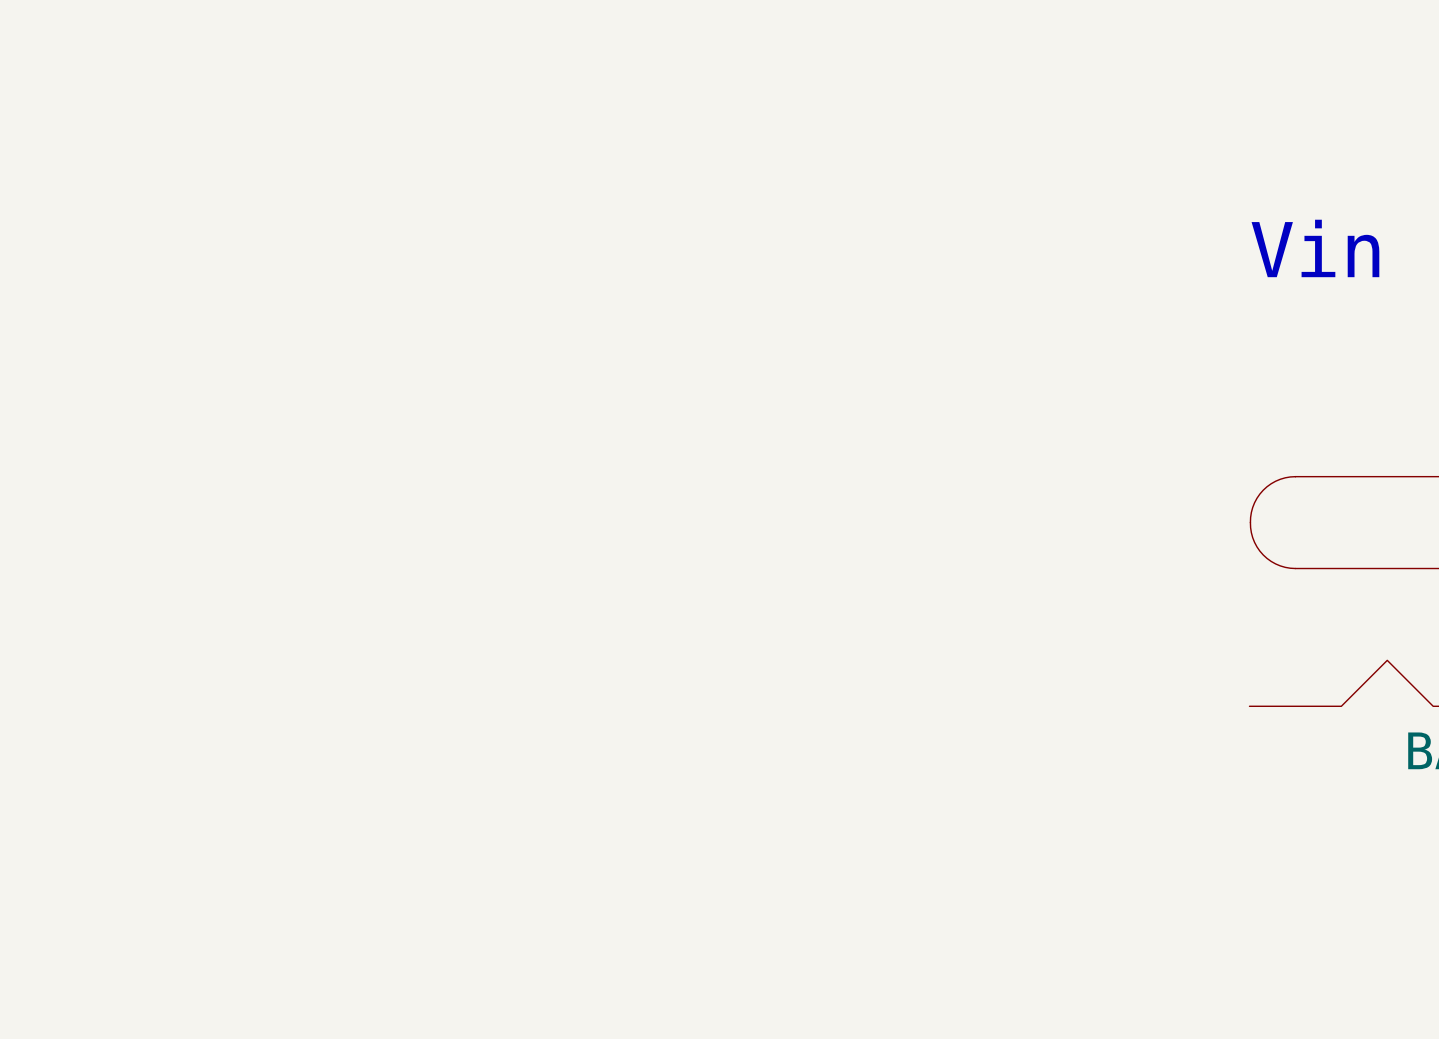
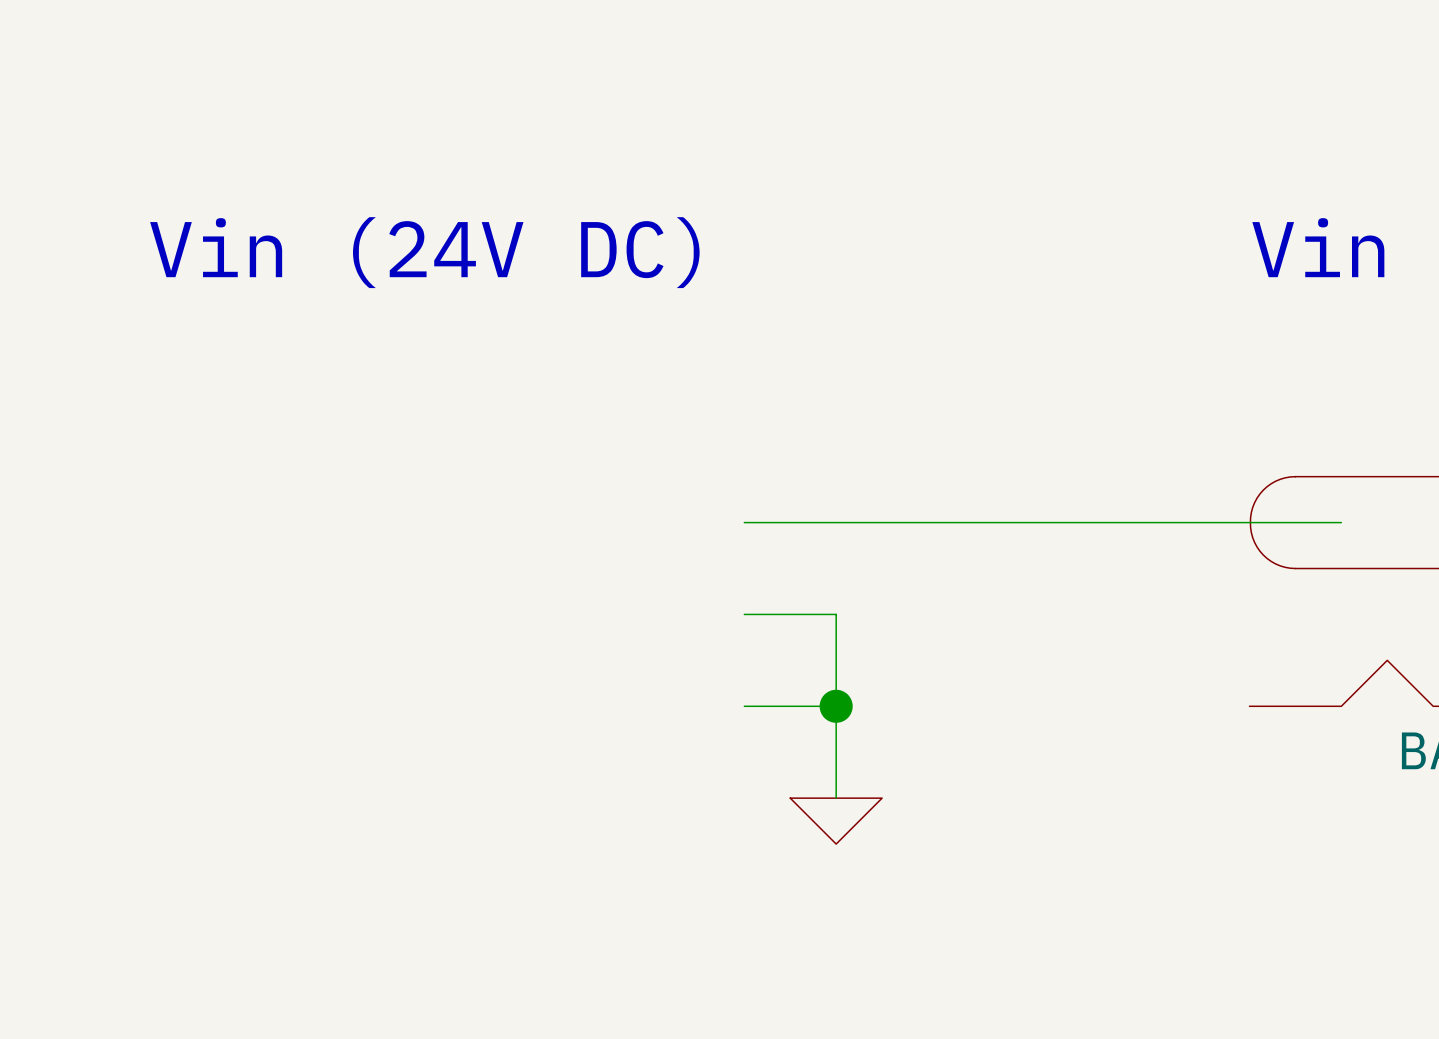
text: none -> Vin (24V DC) (424, 252)
wire: none -> (744, 522) (1341, 522)
wire: none -> (744, 614) (836, 614) (836, 798)
wire: none -> (744, 706) (836, 706)
junction: none -> (836, 706)
power symbol: none -> (836, 821)

